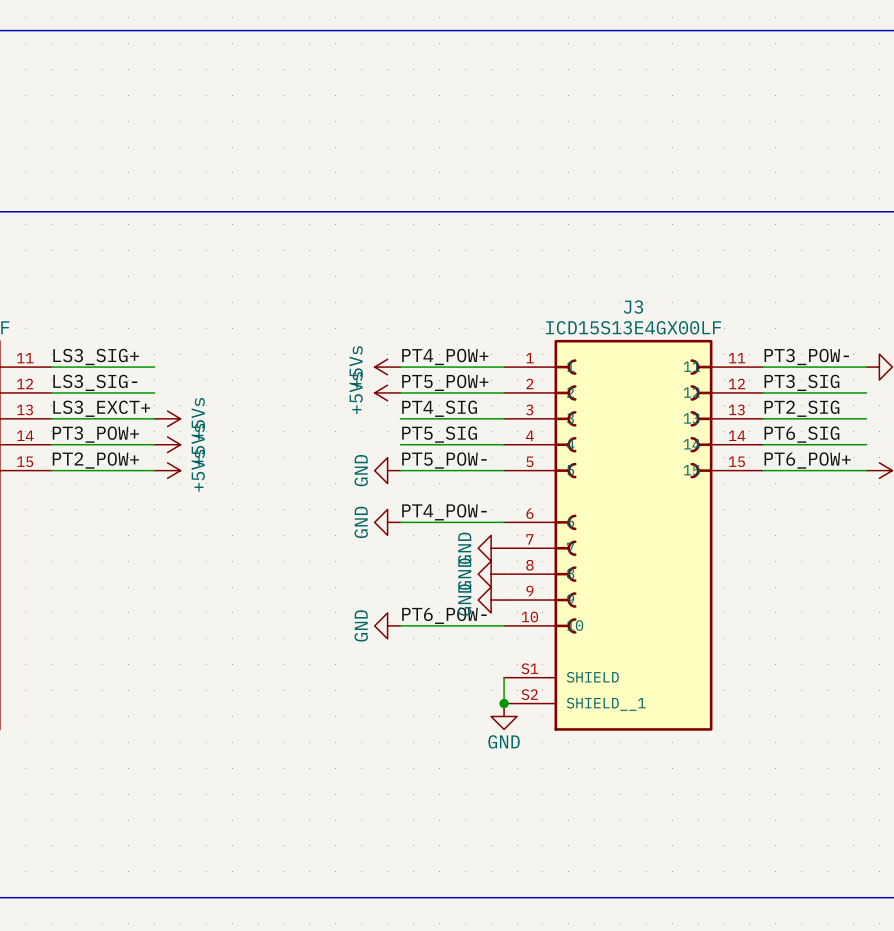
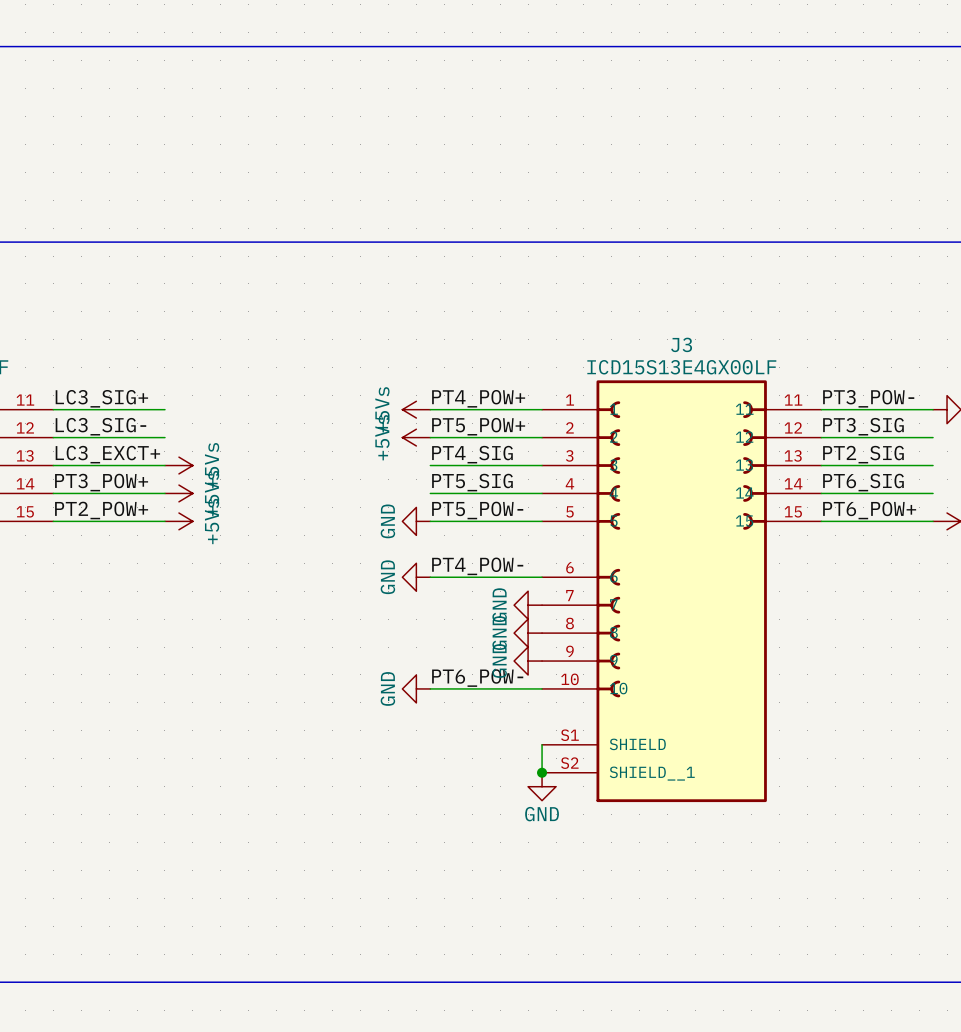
label: LS3_SIG+ (96, 356) -> LC3_SIG+ (101, 398)
label: LS3_SIG- (95, 382) -> LC3_SIG- (100, 426)
label: LS3_EXCT+ (101, 408) -> LC3_EXCT+ (107, 454)

